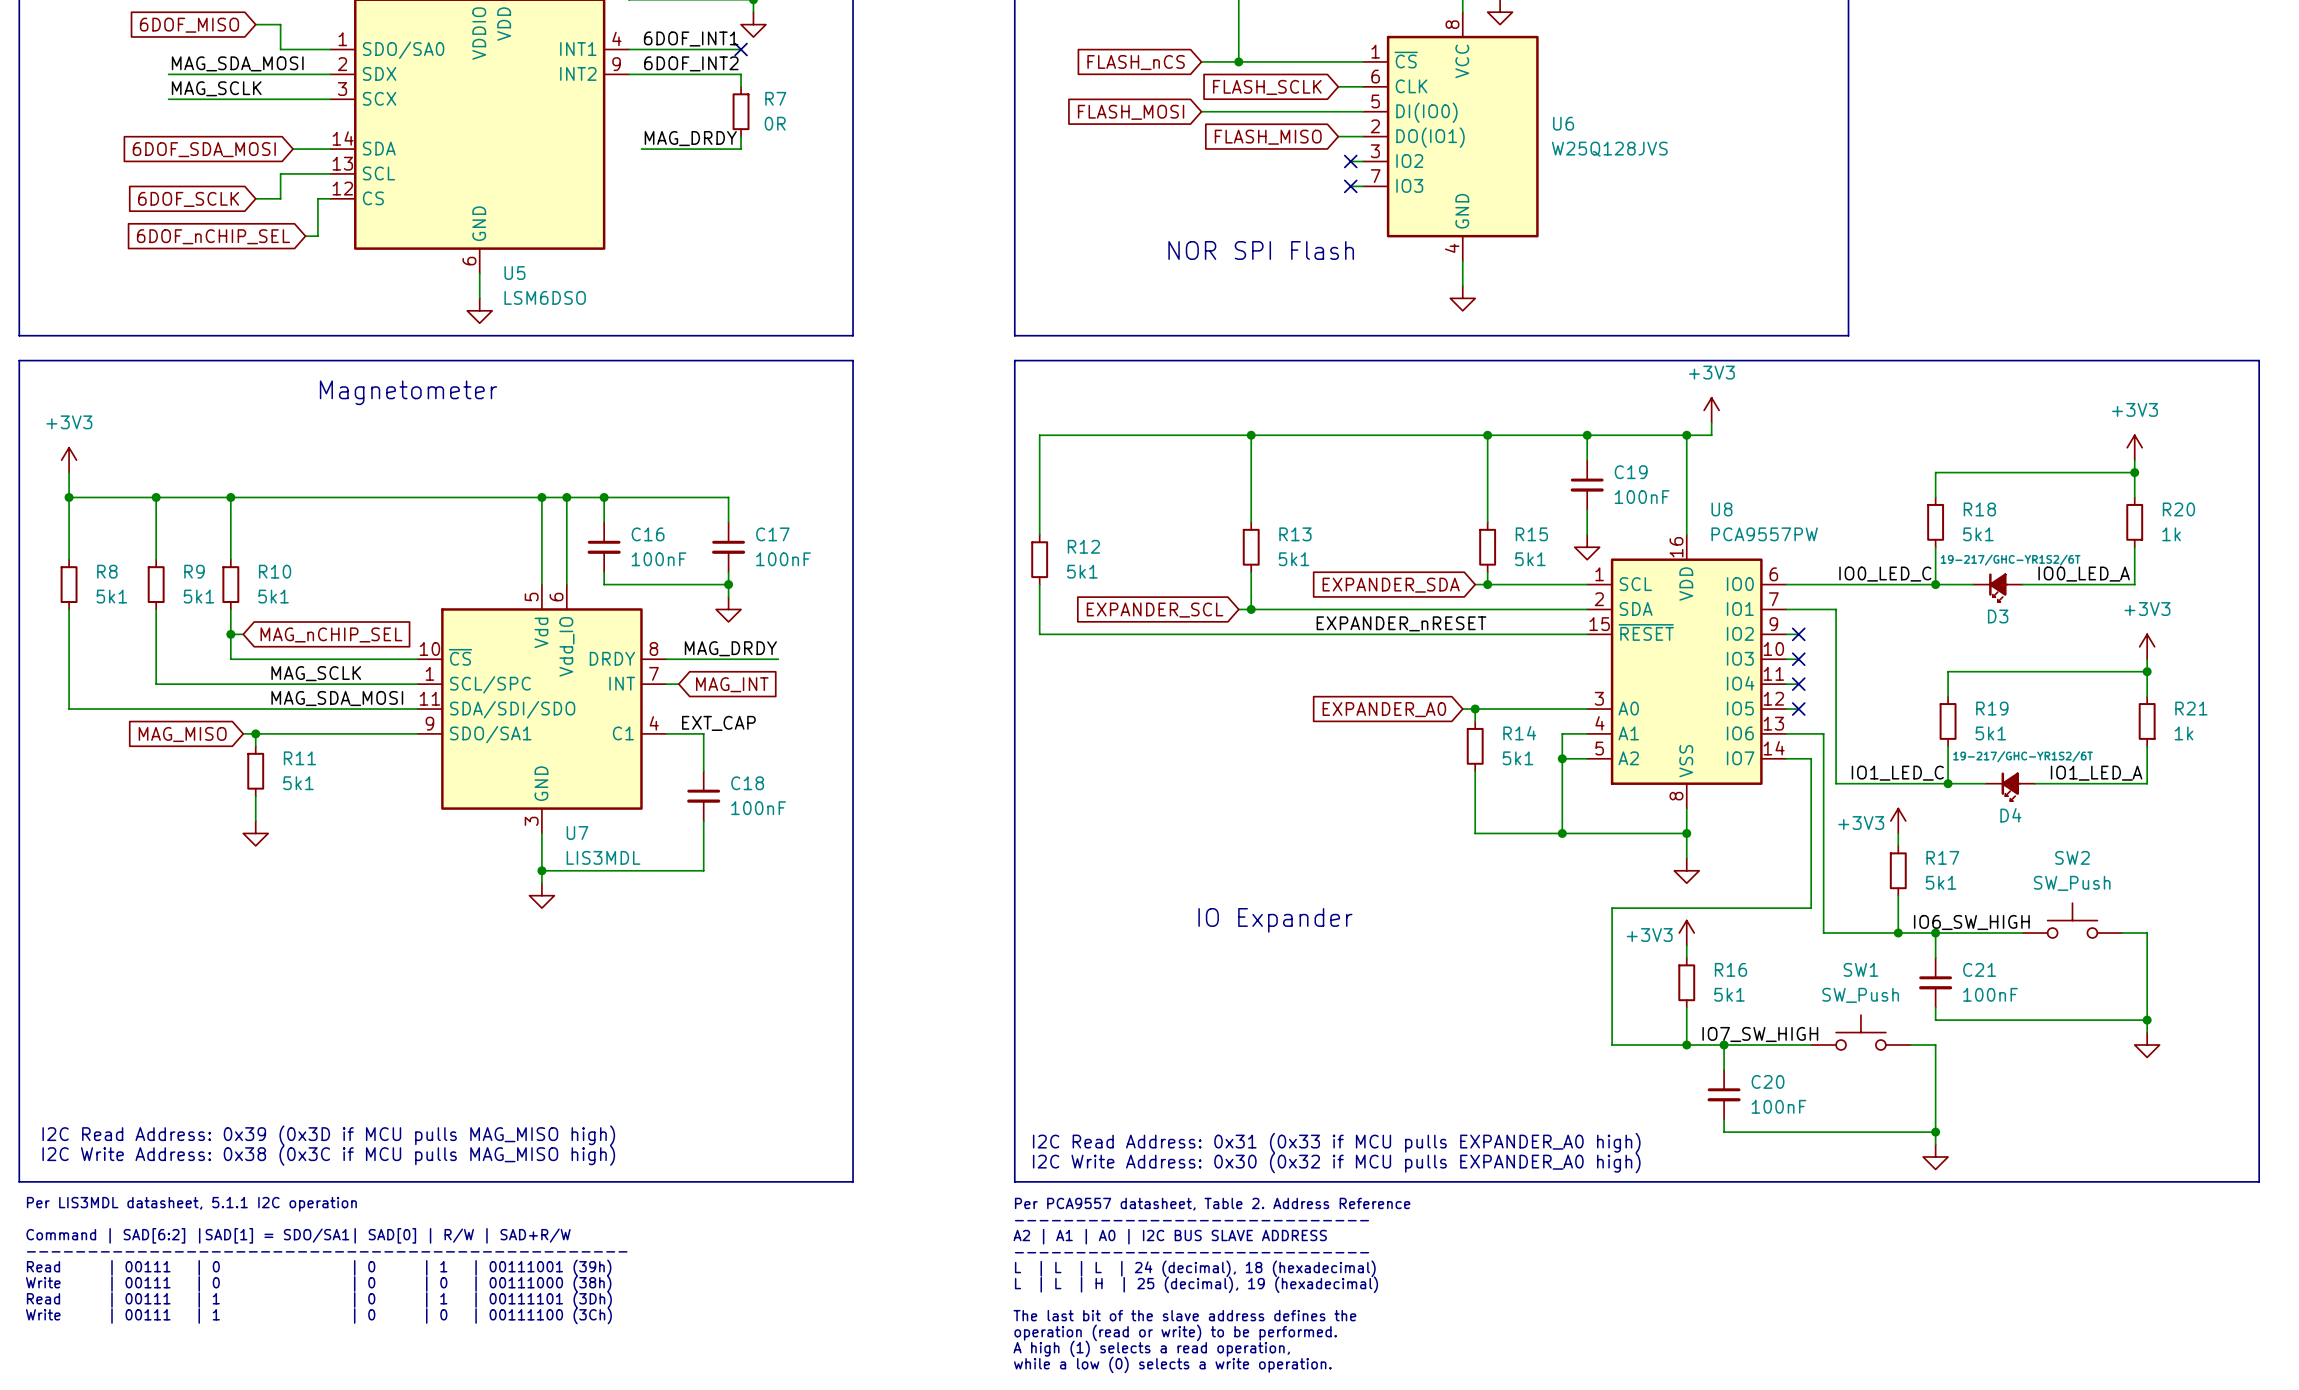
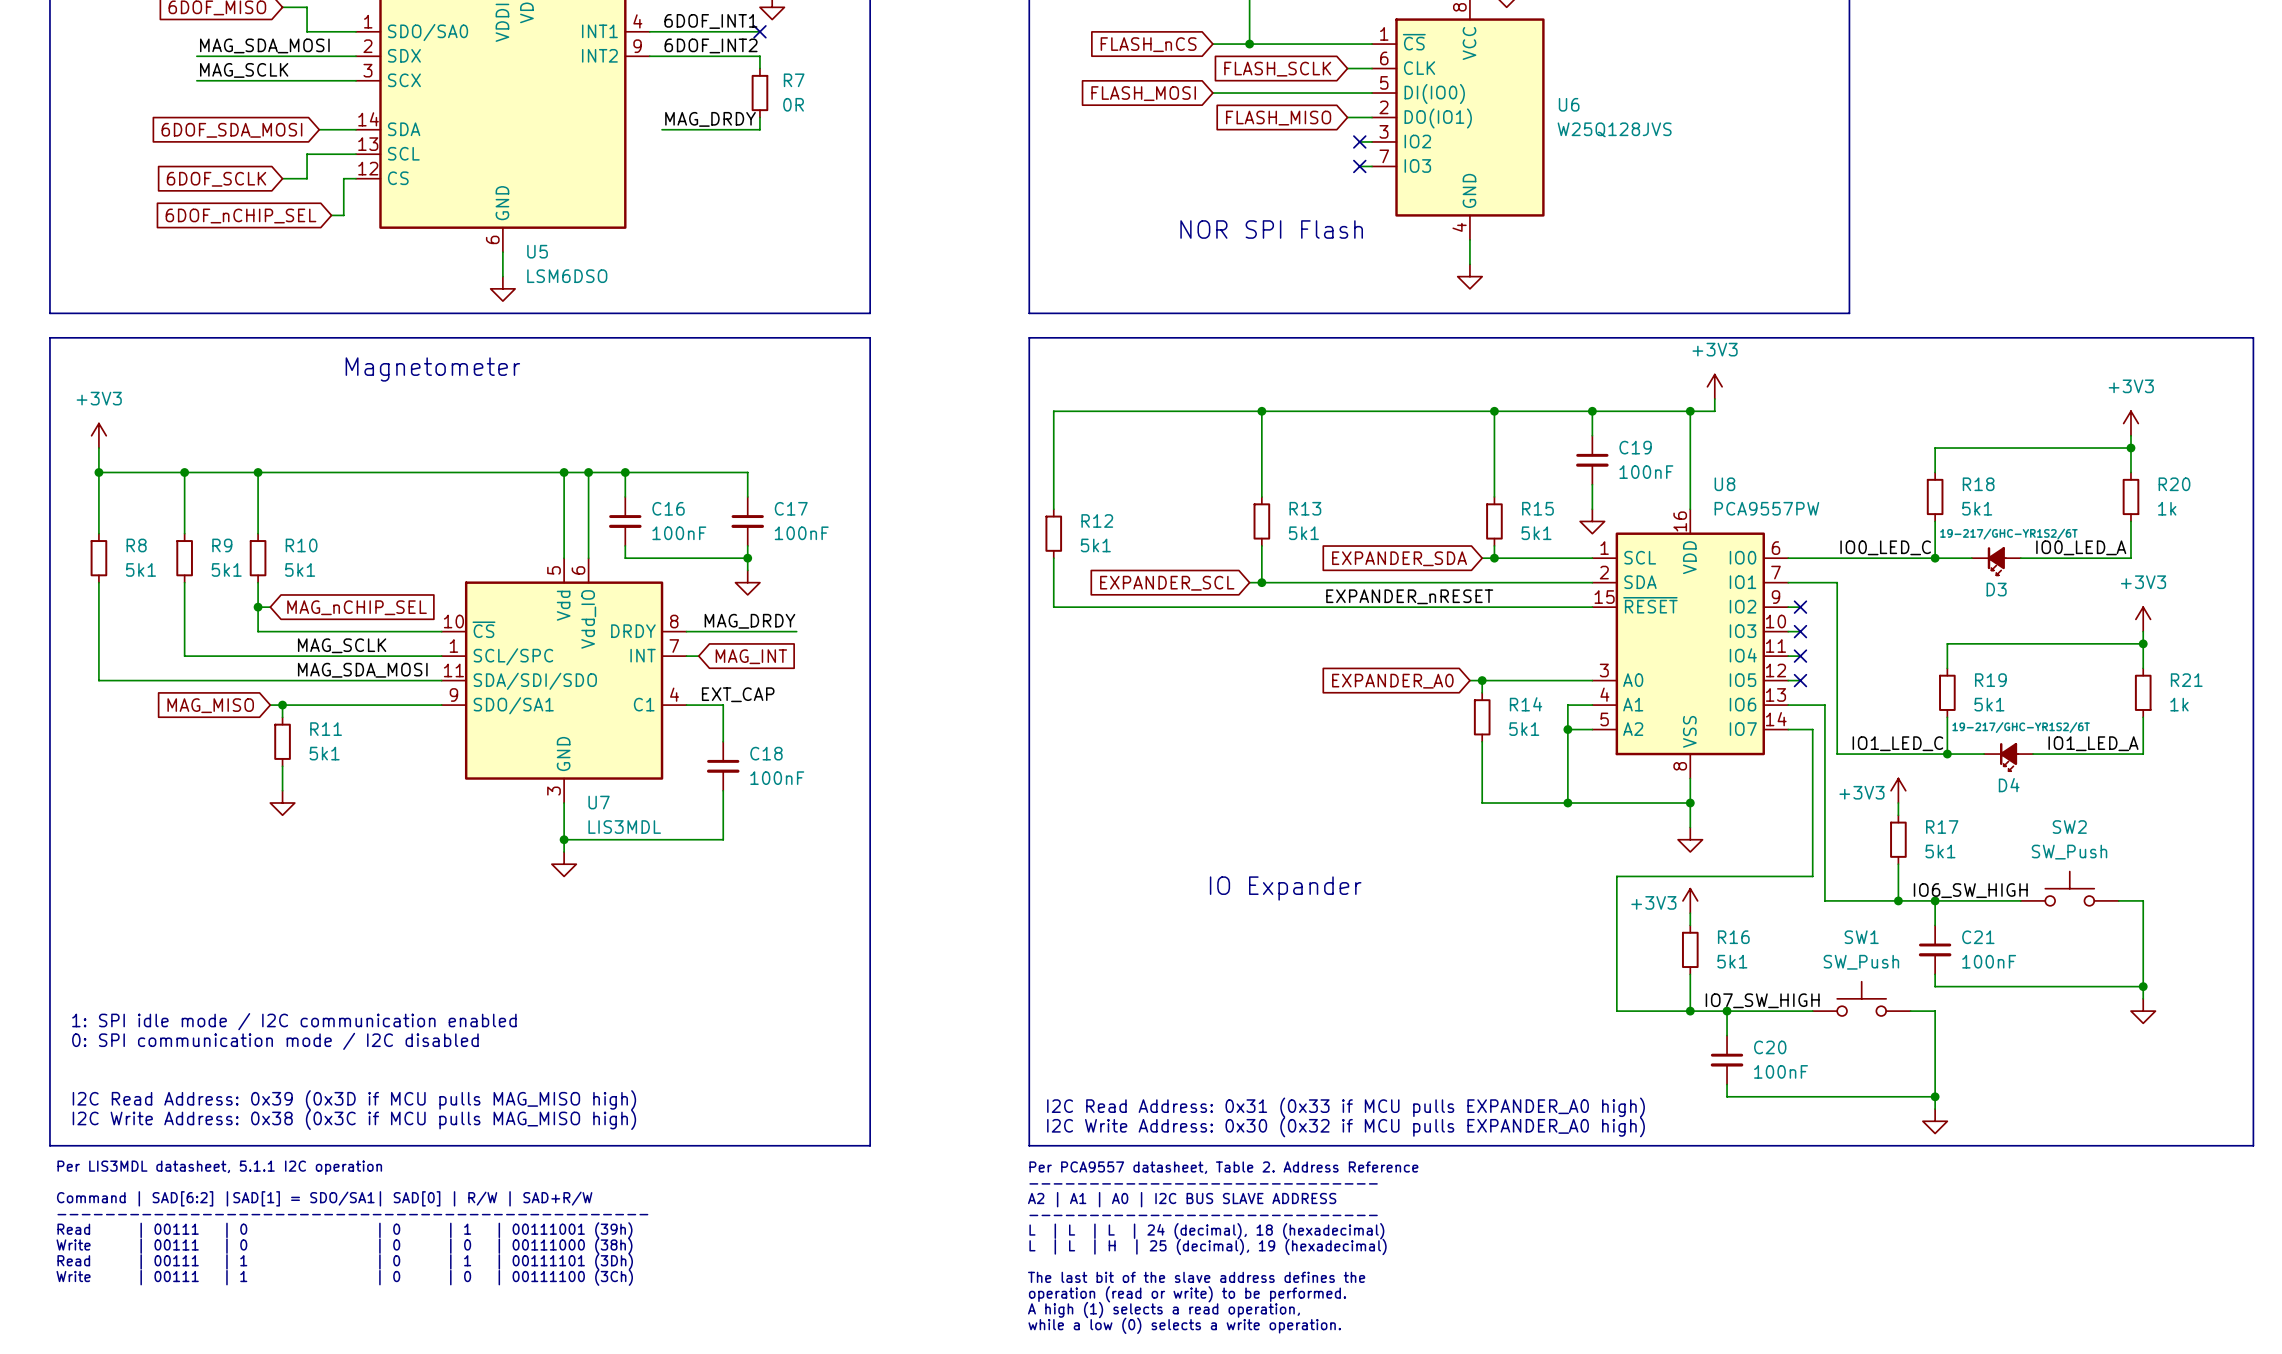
text: none -> 1: SPI idle mode / I2C communication enabled (294, 1021)
text: none -> 0: SPI communication mode / I2C disabled (275, 1041)

